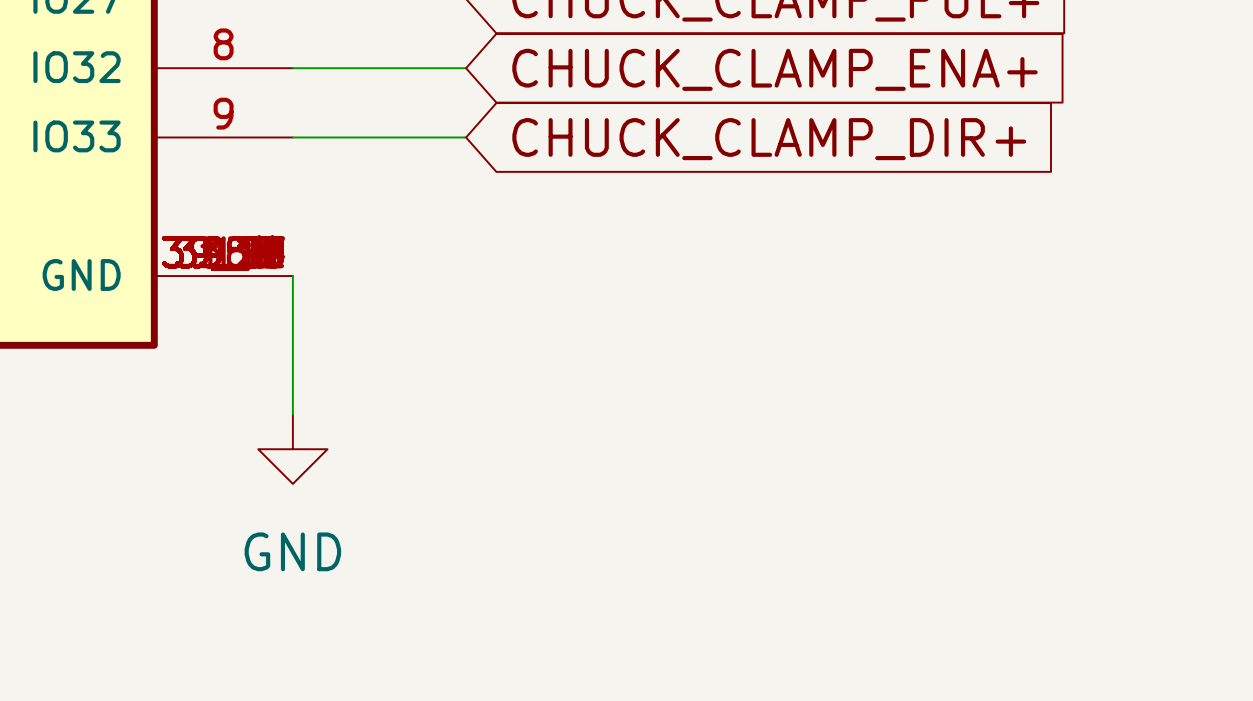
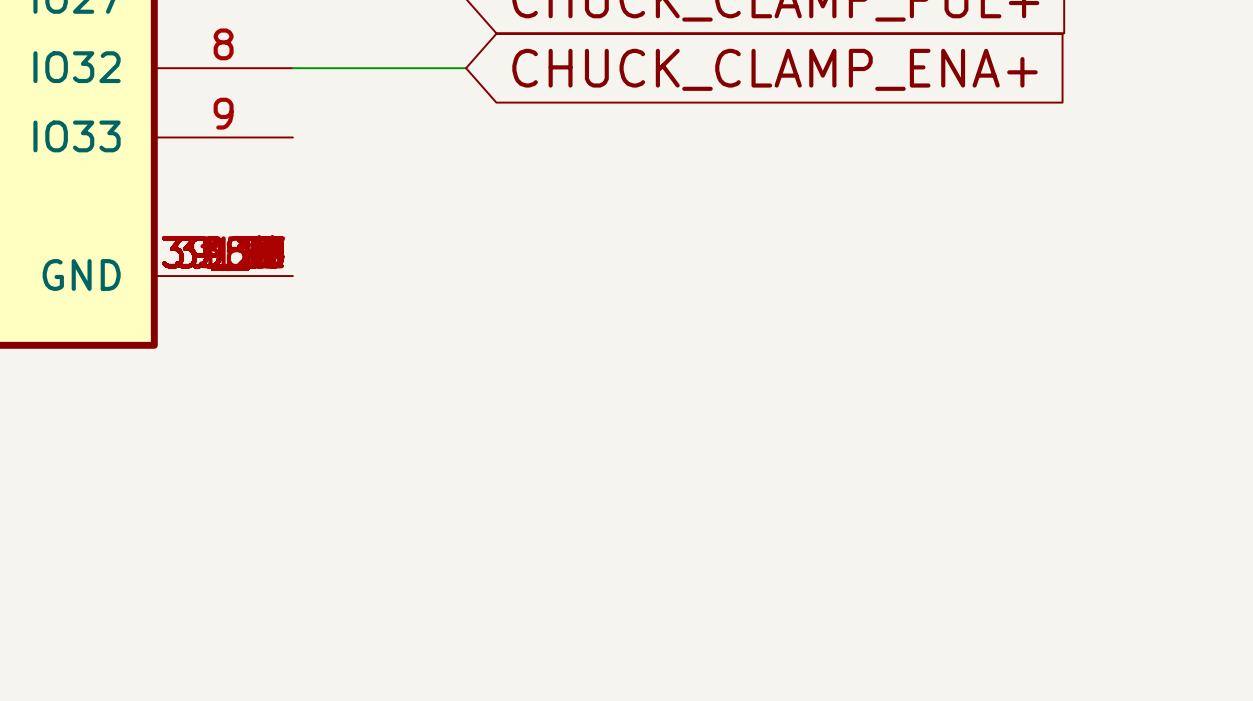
wire: (292, 137) (466, 137) -> none
global label: CHUCK_CLAMP_DIR+ (769, 139) -> none
wire: (292, 276) (292, 414) -> none
power symbol: GND (292, 449) -> none

